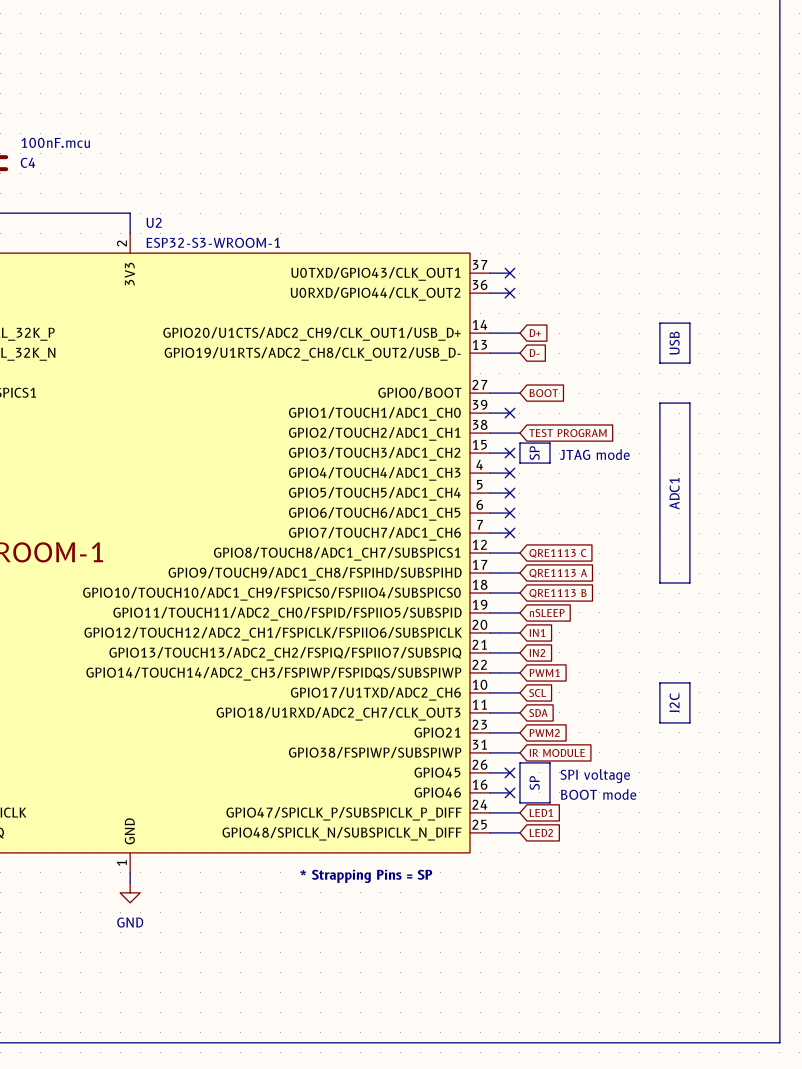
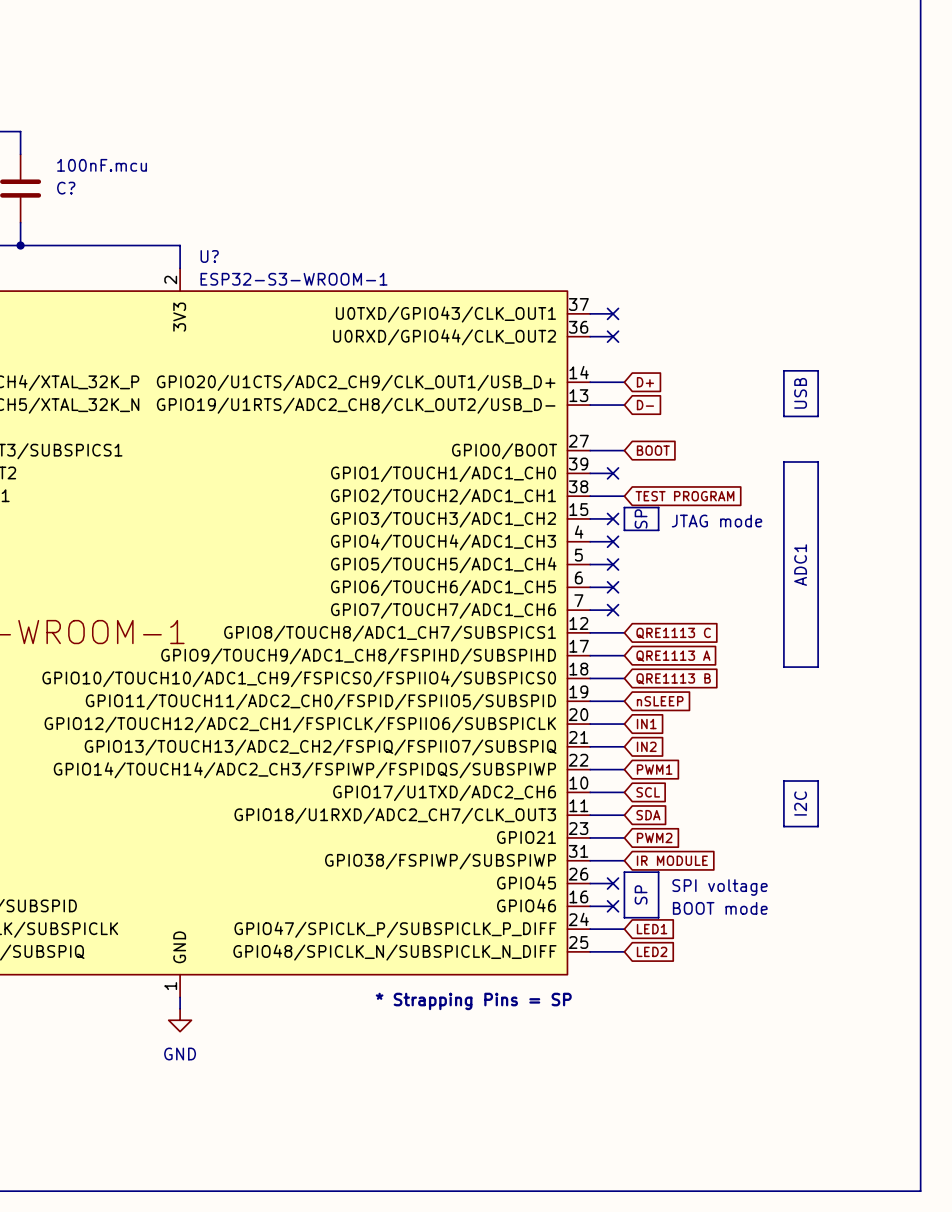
C4 name: C4 (28, 162) -> C? (66, 188)
U2 name: U2 (154, 222) -> U? (209, 256)

